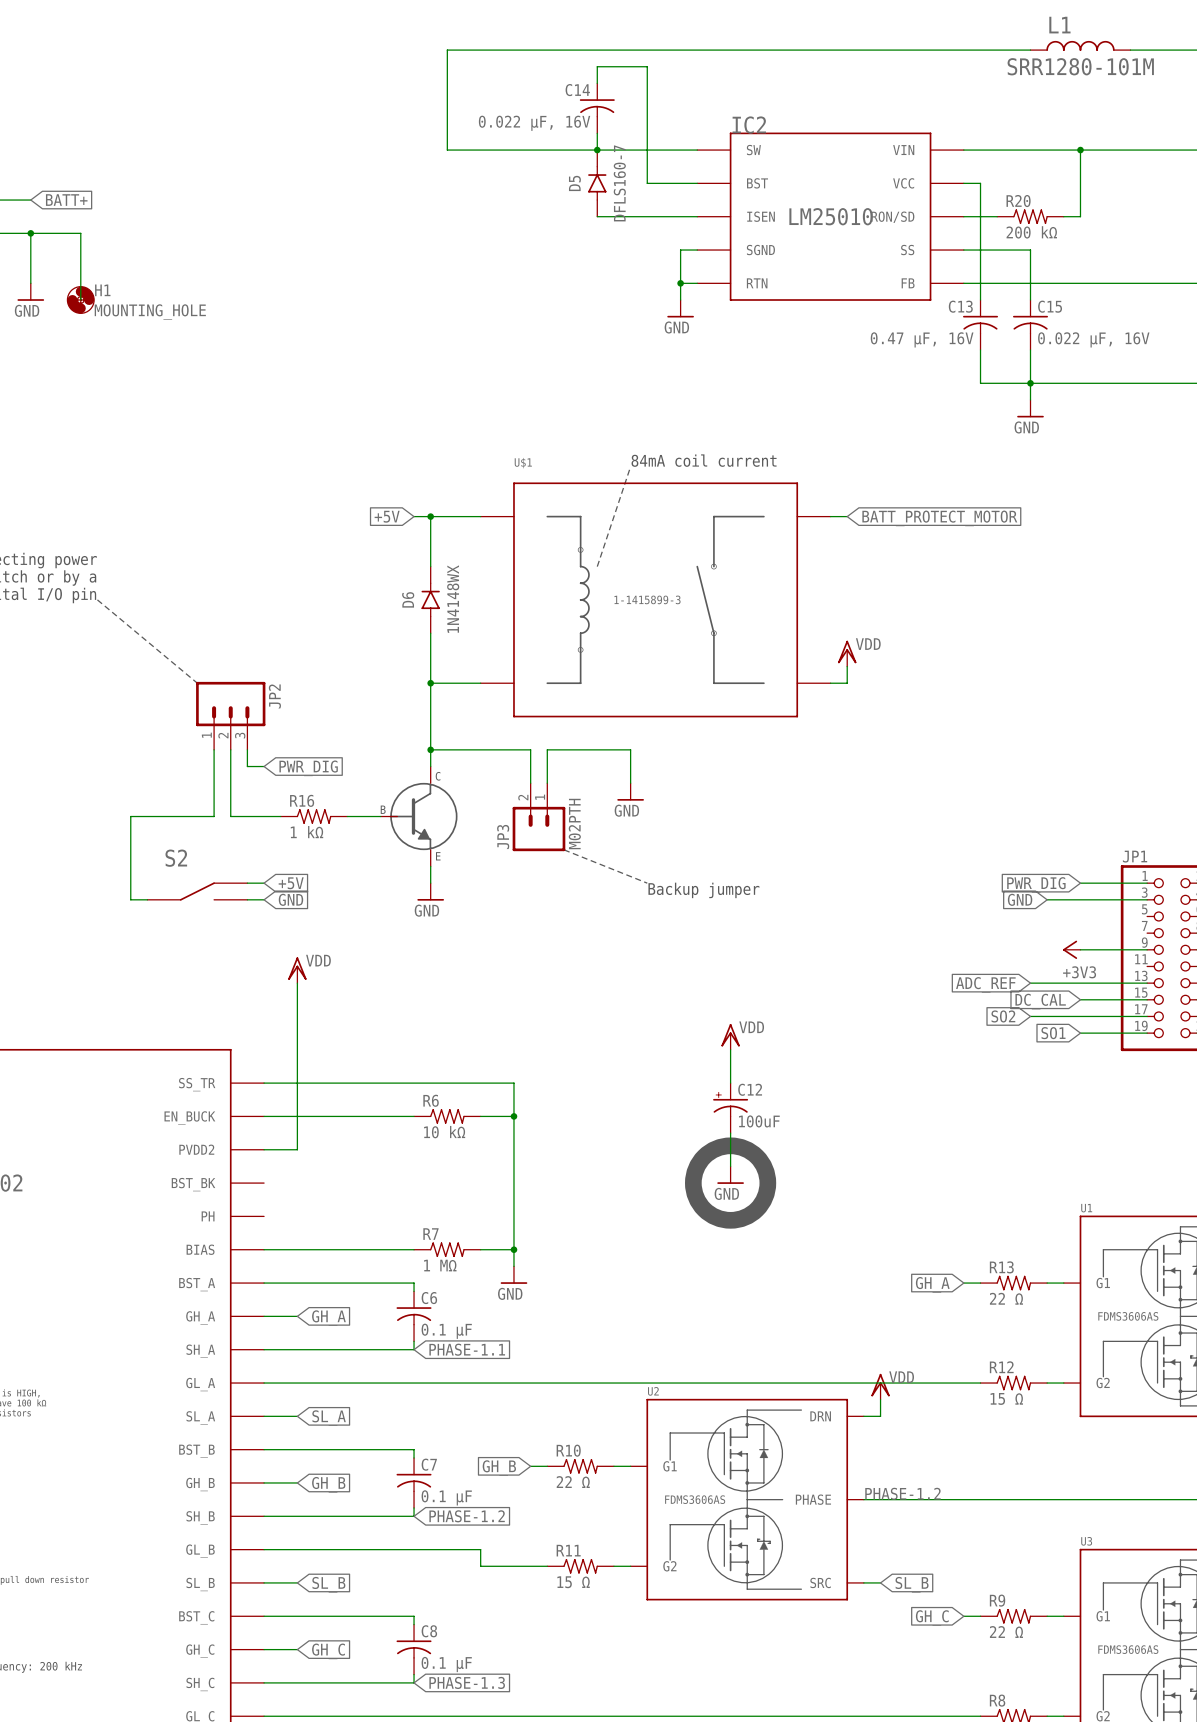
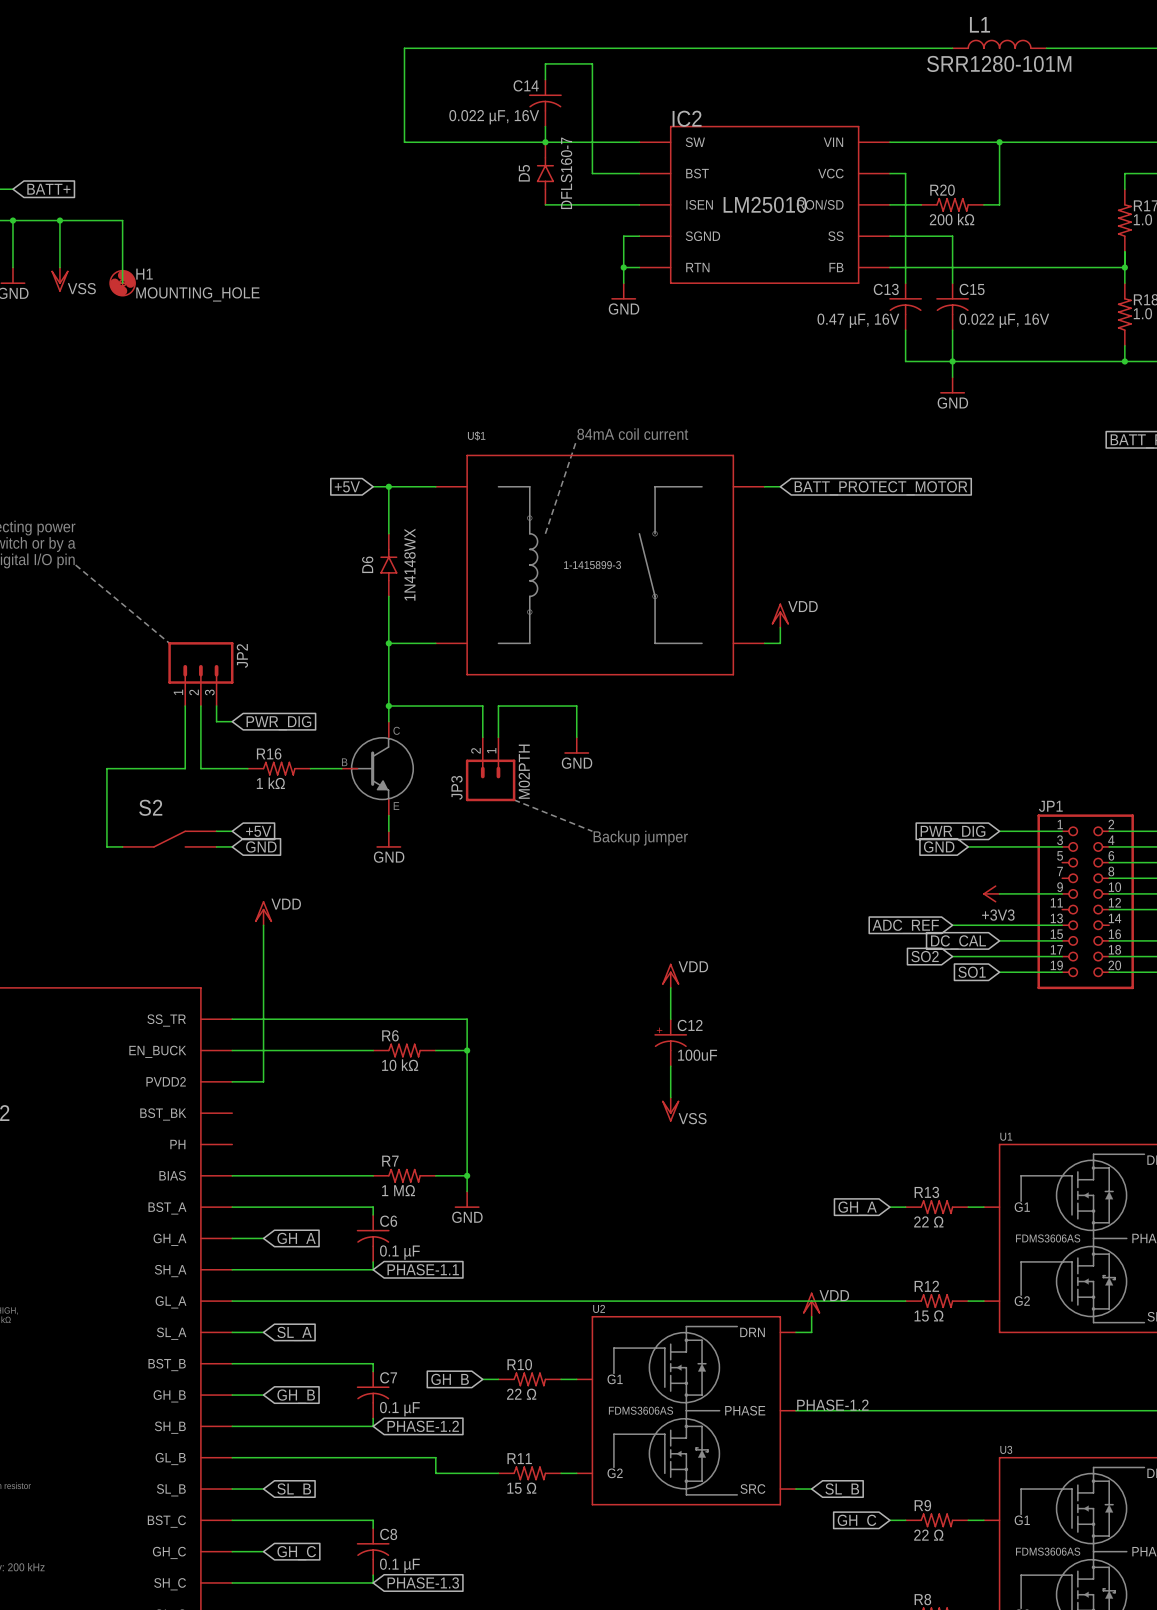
wire: none -> (59, 220) (122, 220) (122, 283)
junction: none -> (59, 220)
power symbol: none -> VSS (59, 279)
H1 position: (80, 300) -> (122, 283)
drawing: [685, 1137, 777, 1229] -> none
power symbol: GND (730, 1175) -> VSS (670, 1109)

